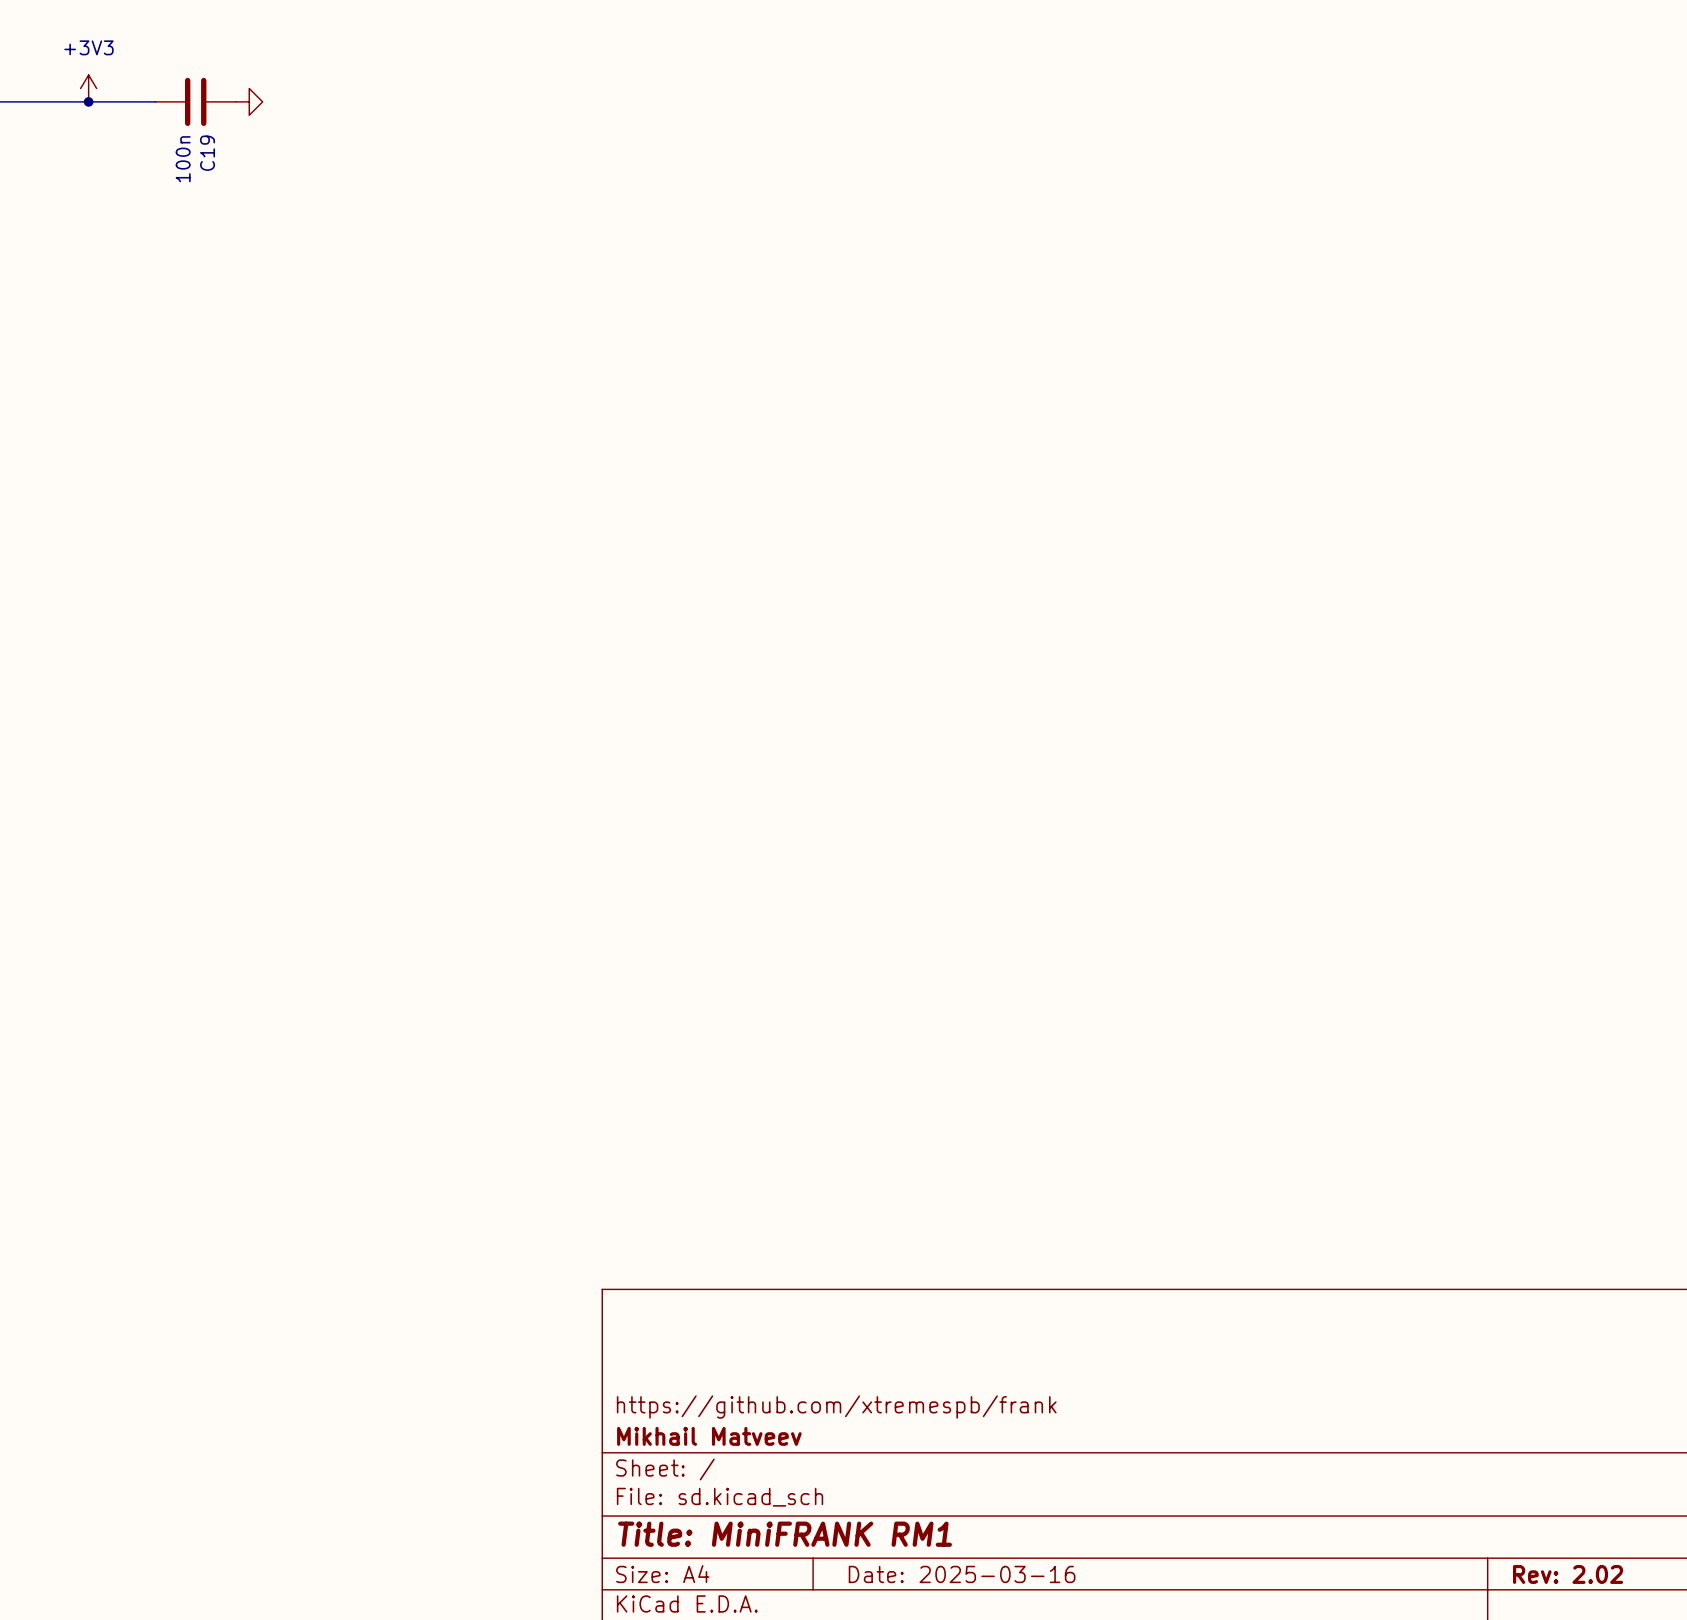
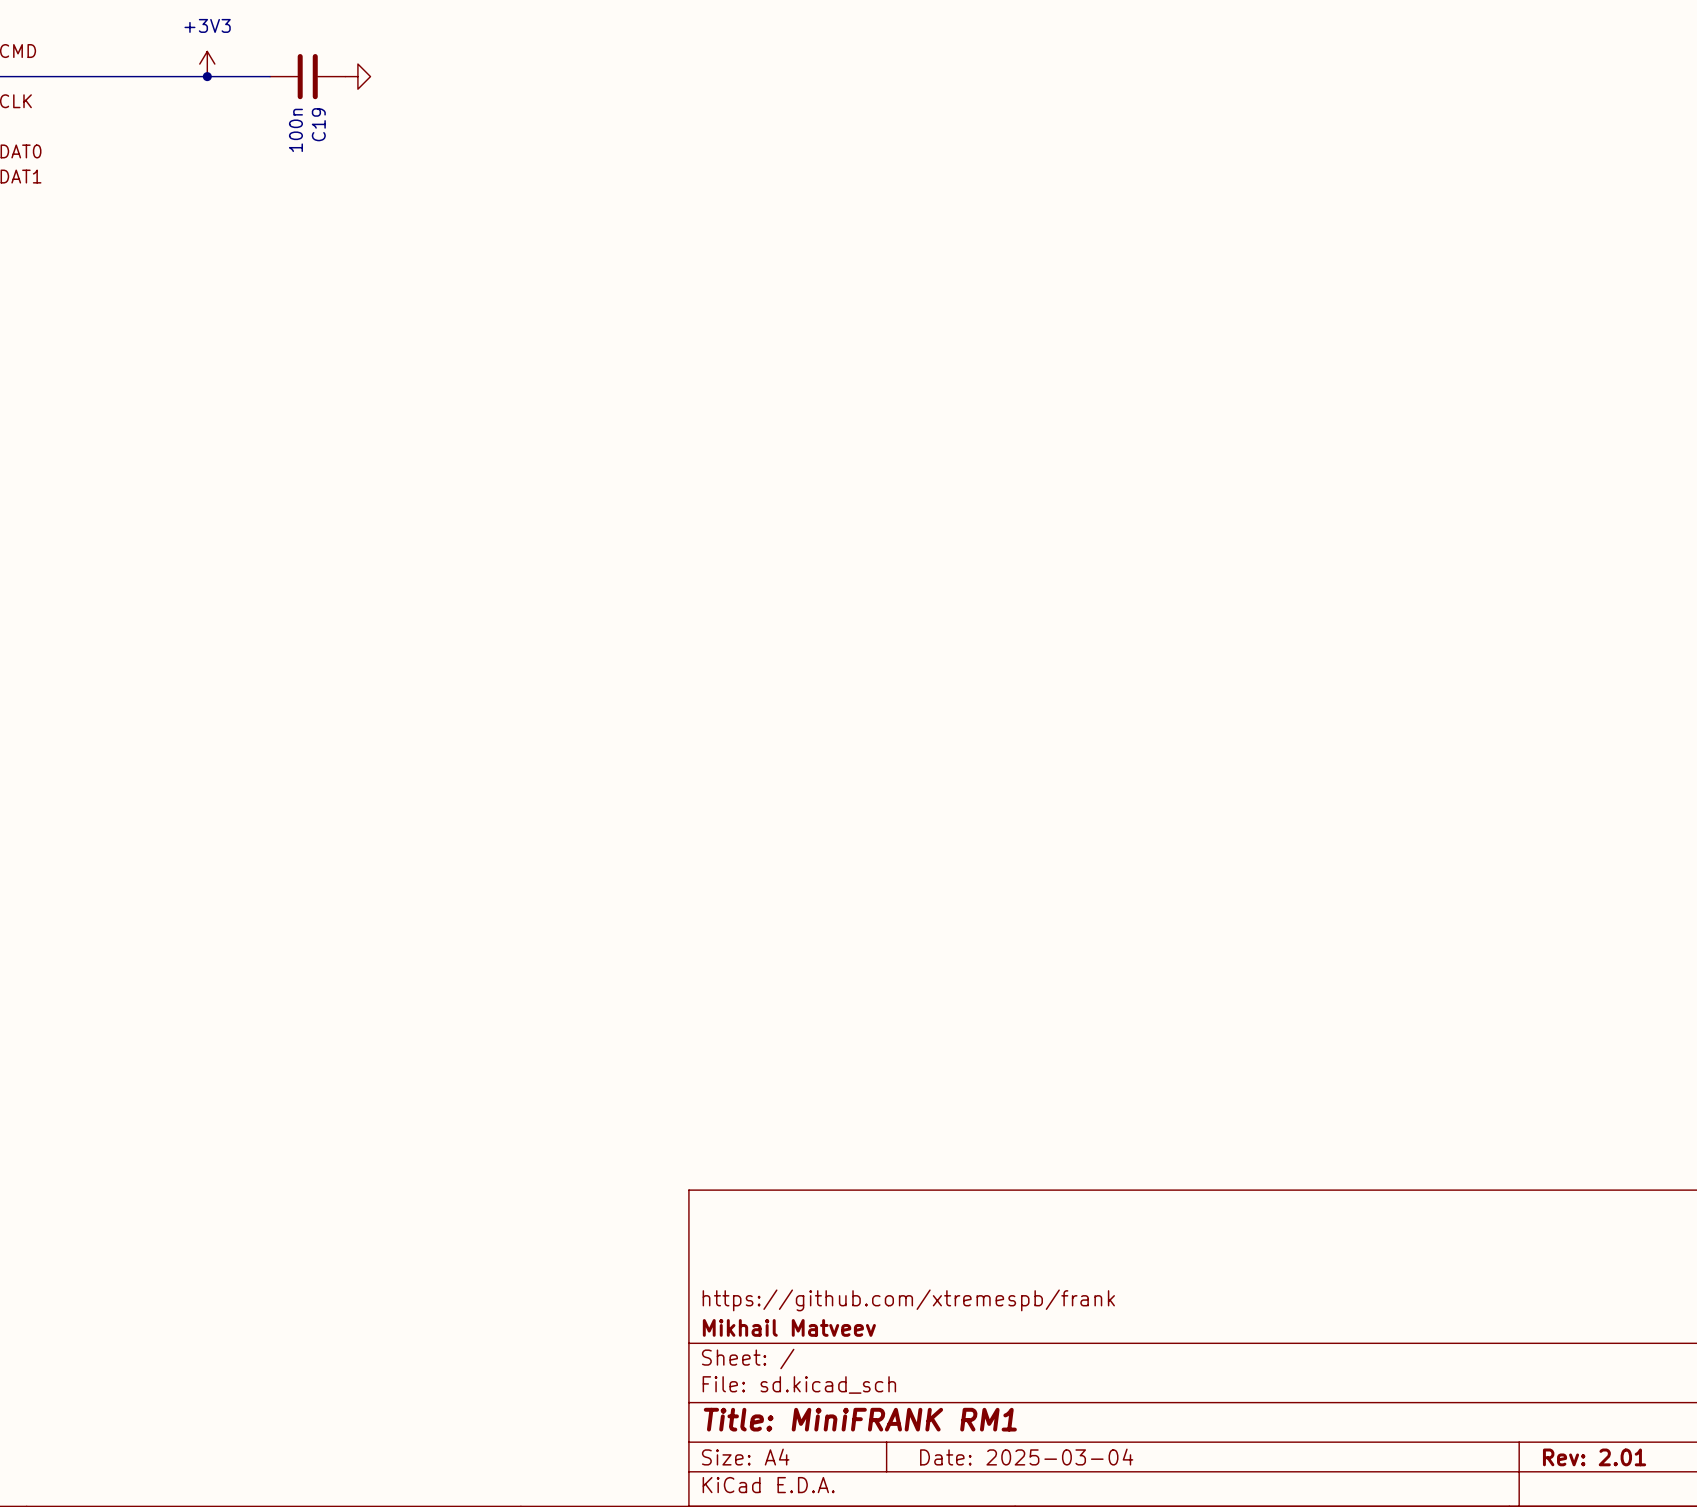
title block: Date: 2025-03-16 (962, 1574) -> Date: 2025-03-04 (1026, 1457)
title block: Rev: 2.02 (1568, 1574) -> Rev: 2.01 (1594, 1457)

